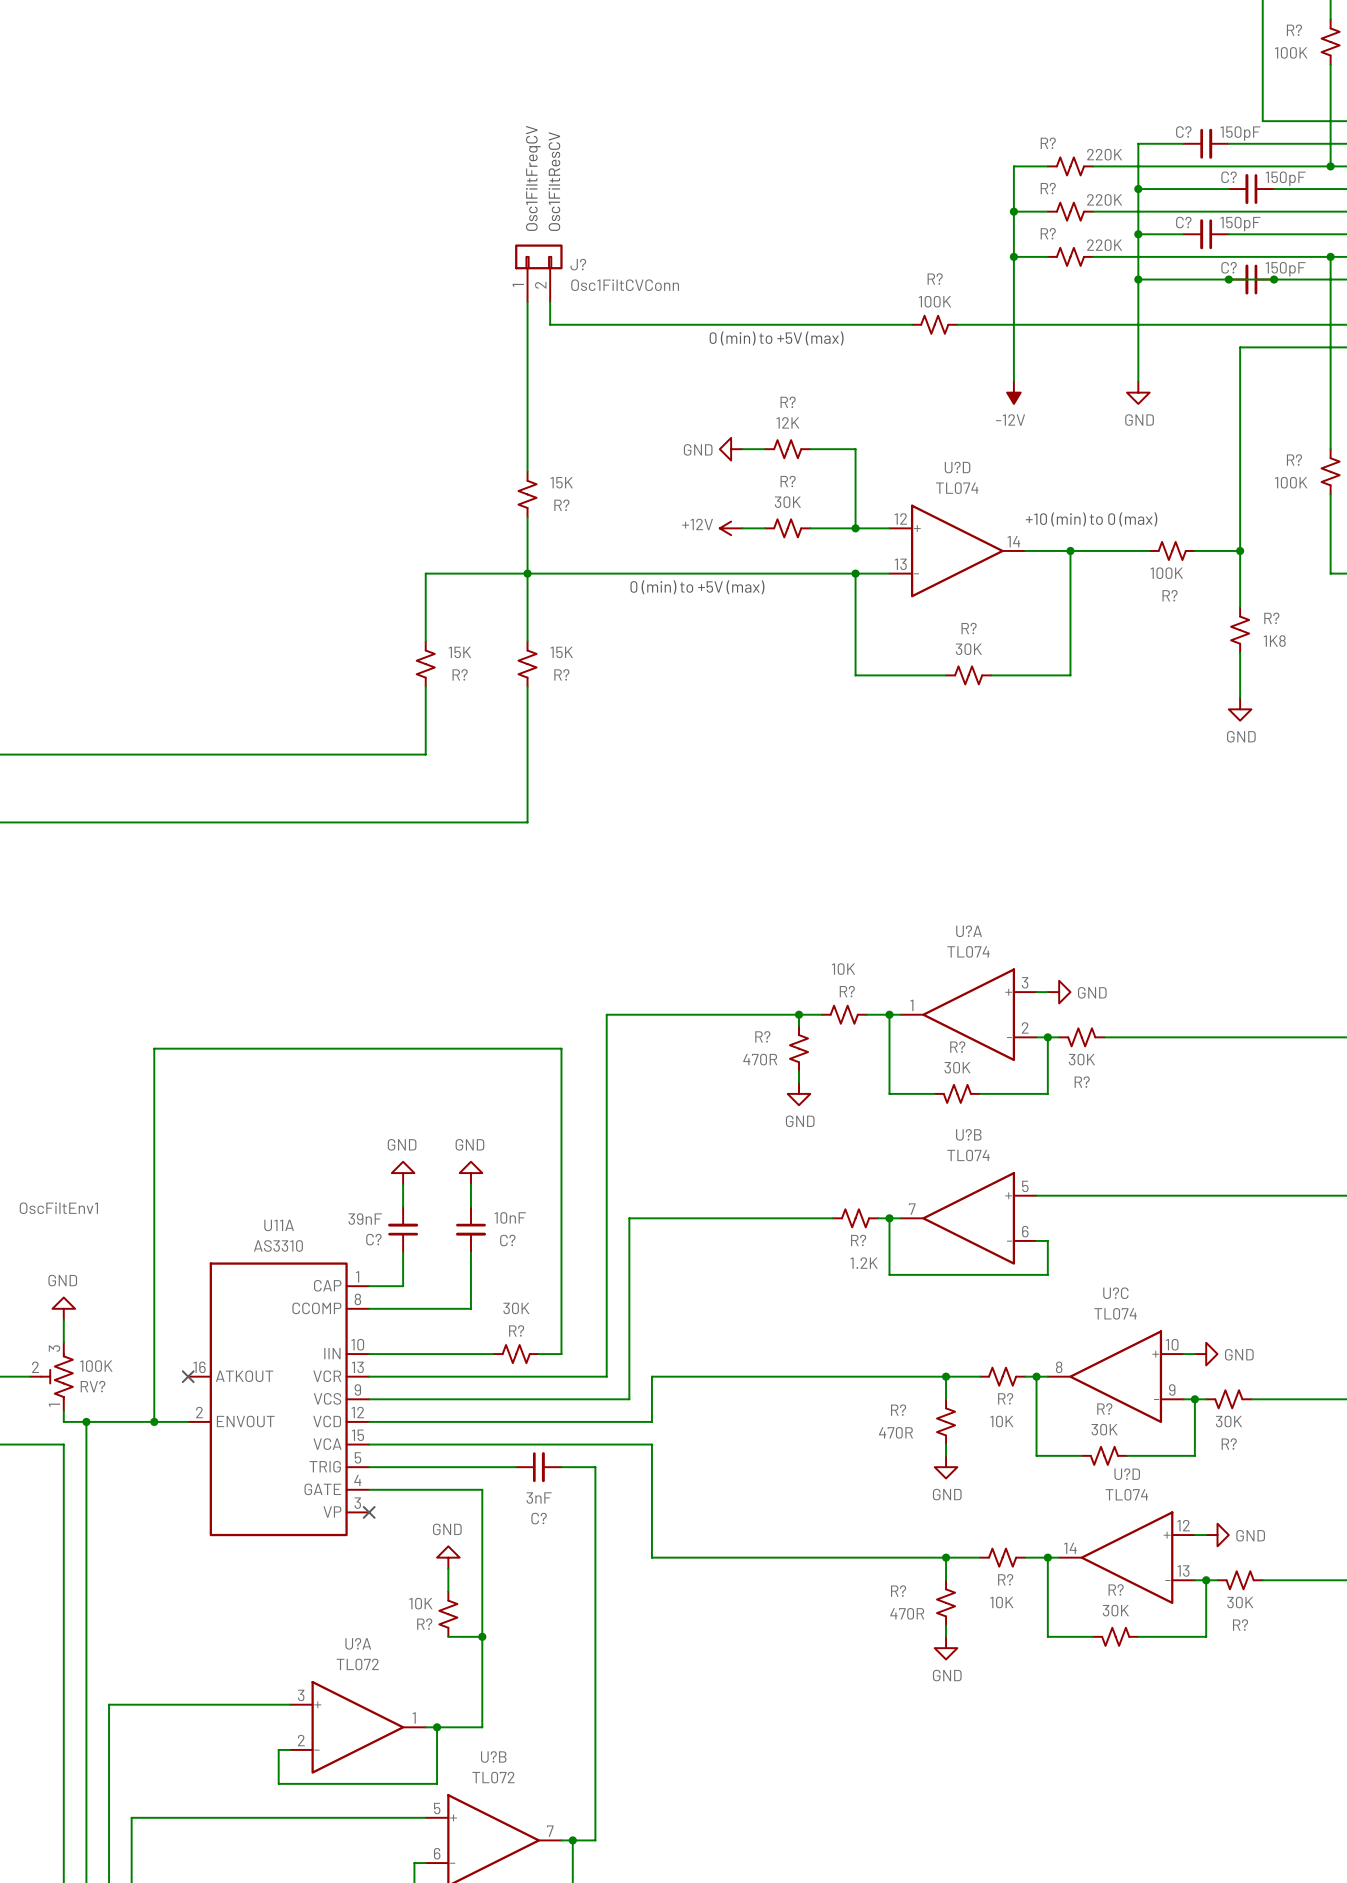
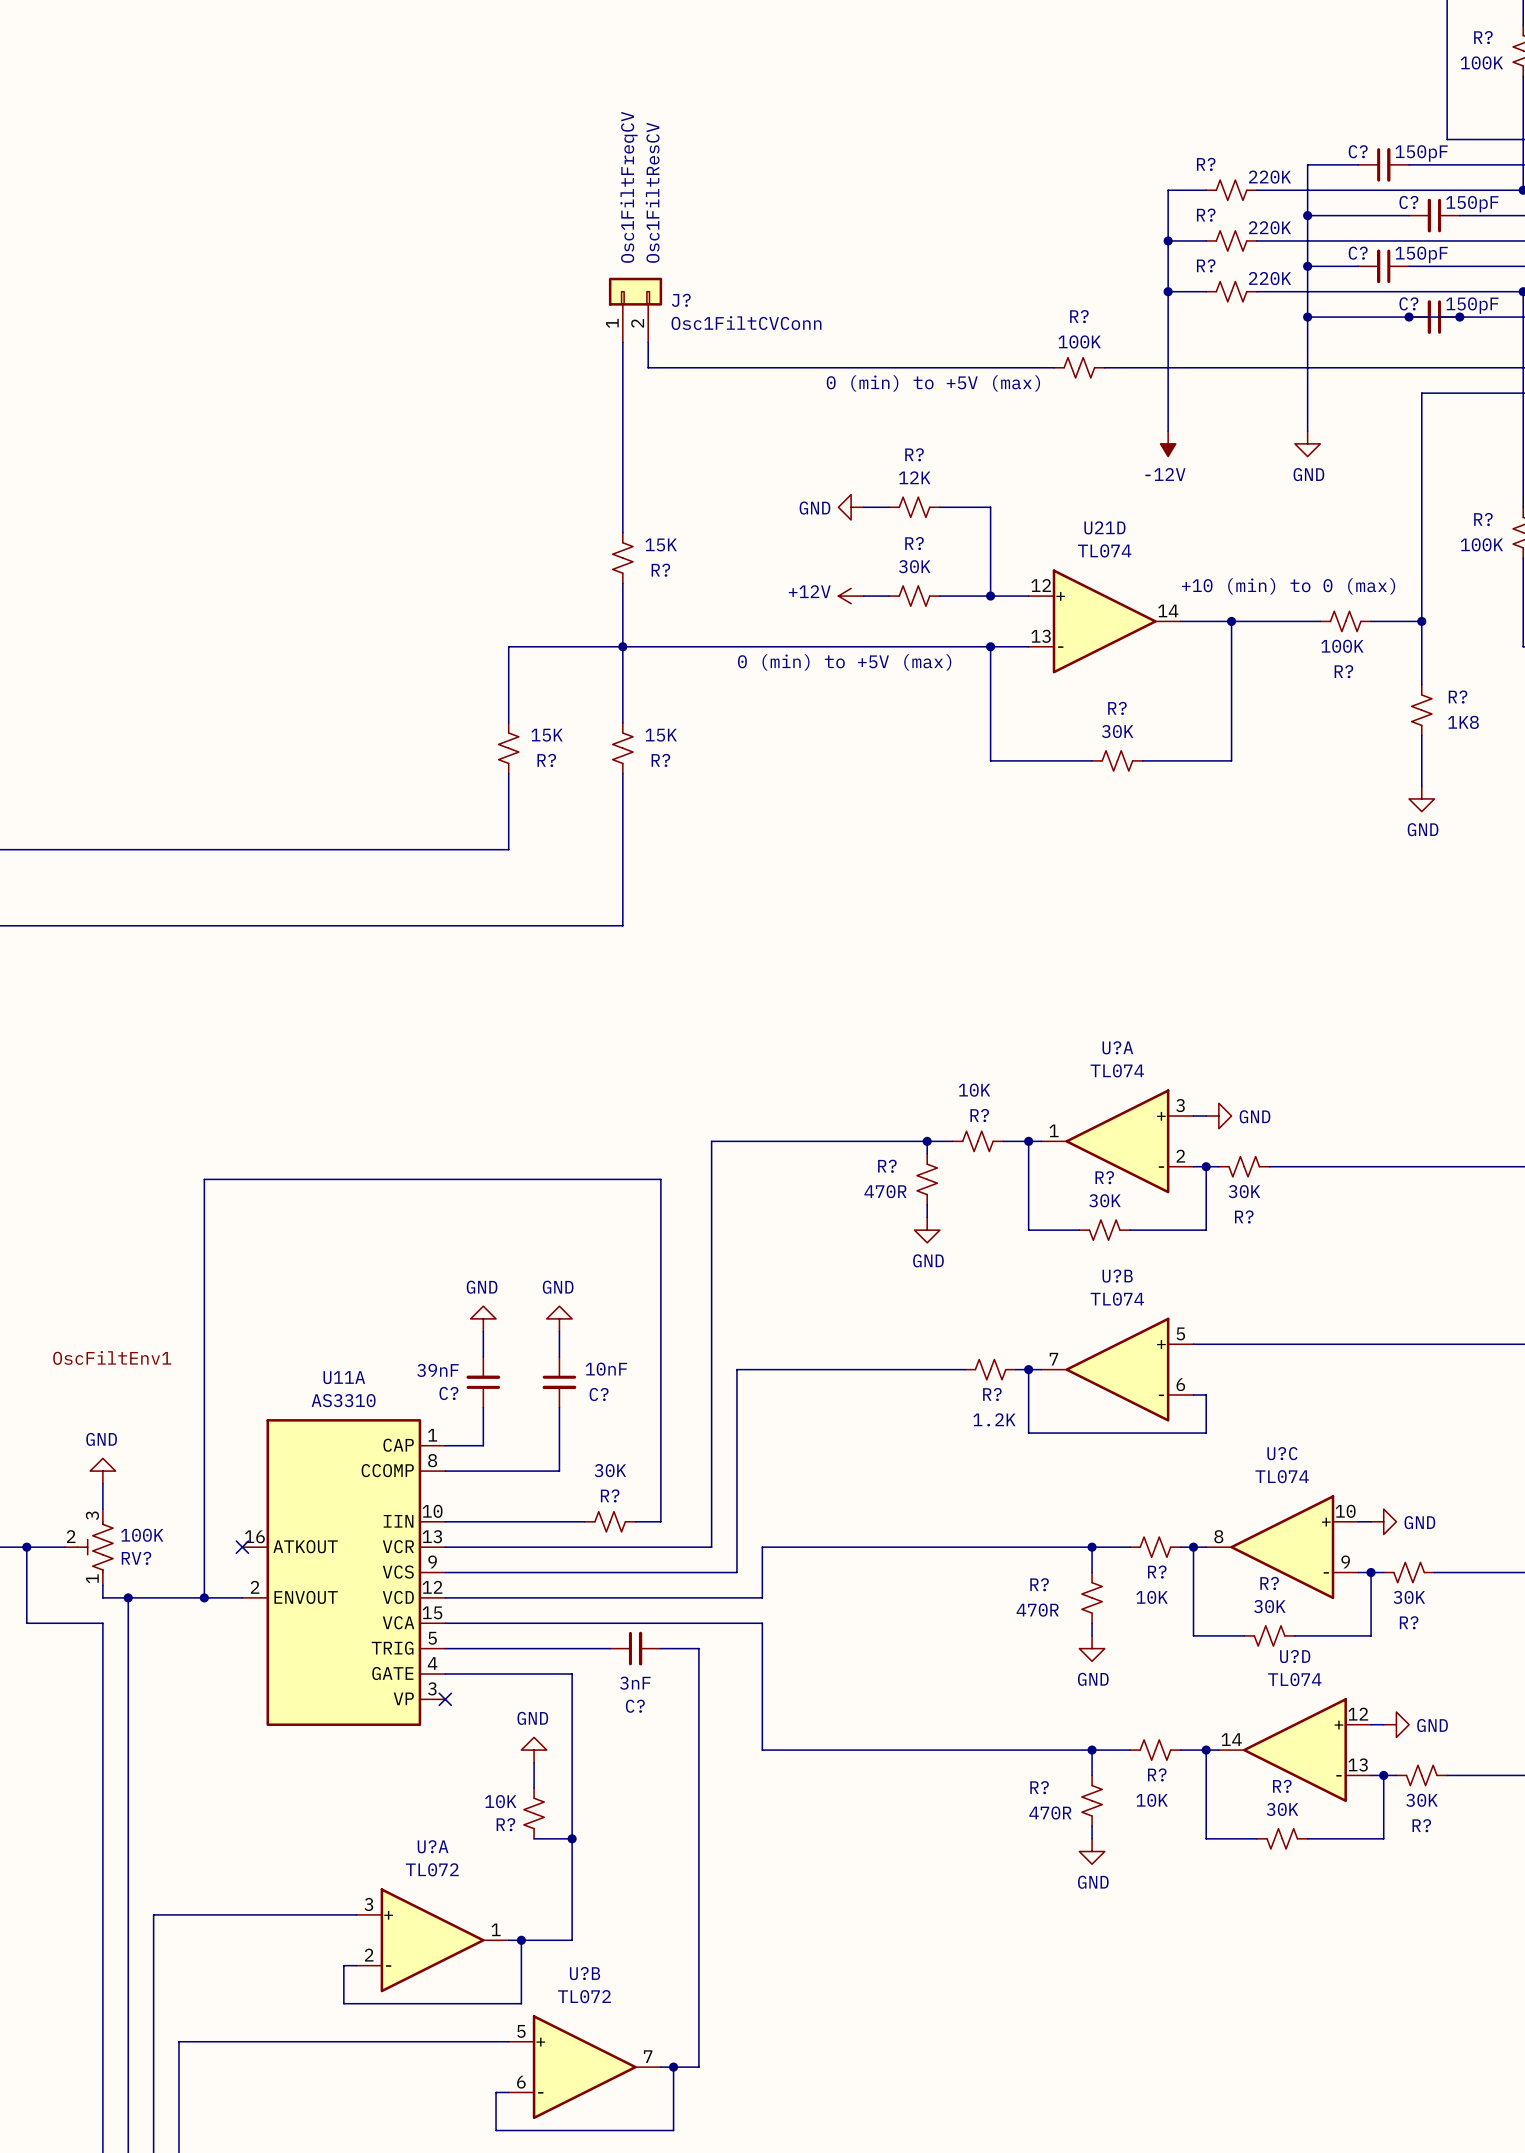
U?D name: U?D (957, 467) -> U21D (1104, 527)

